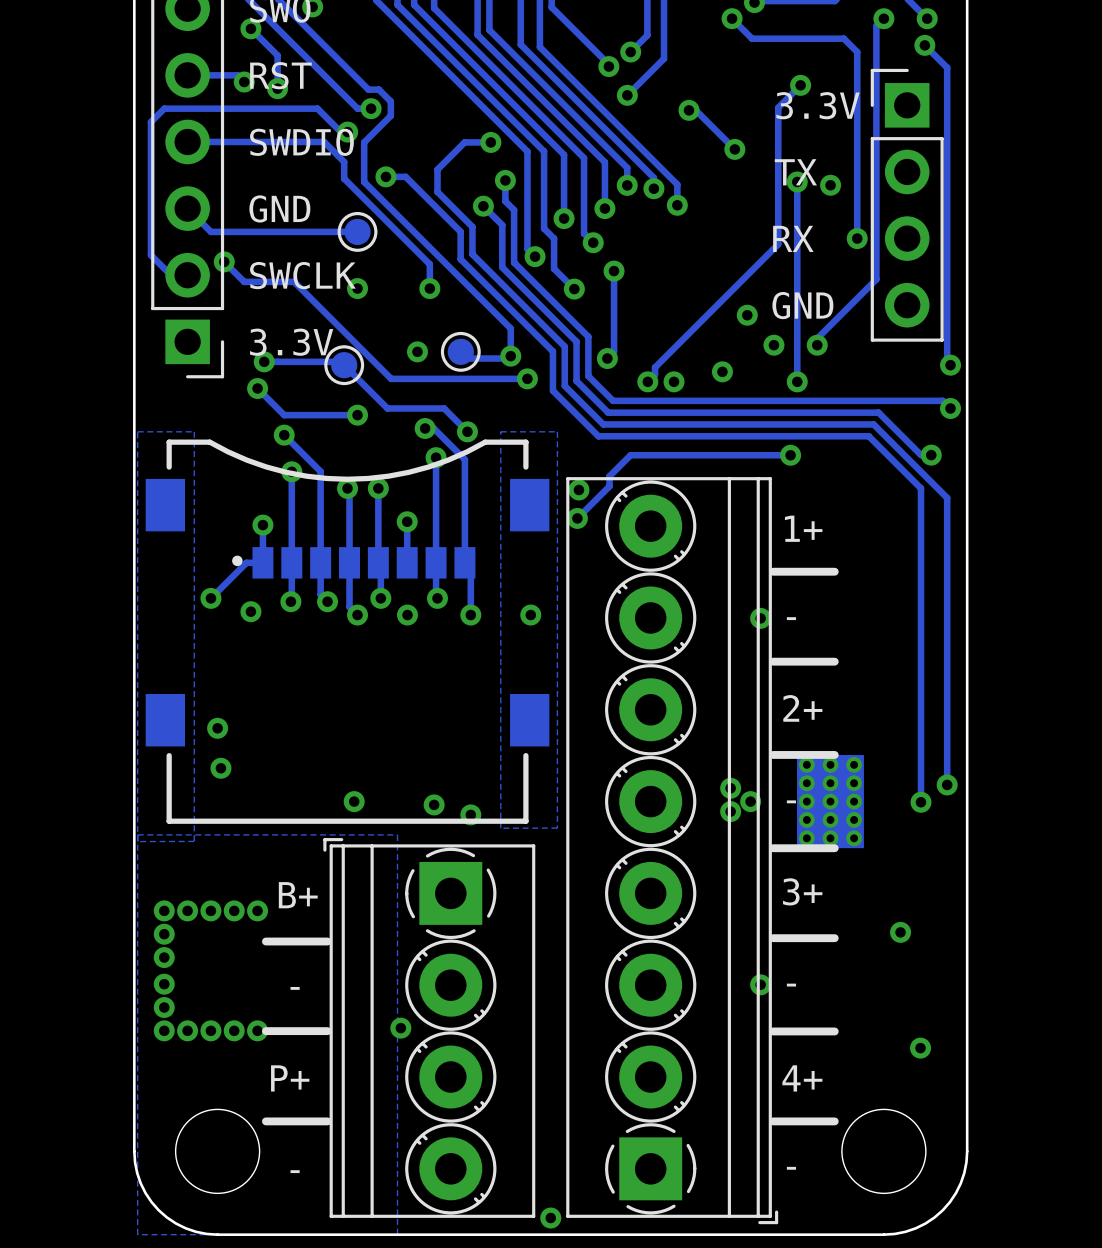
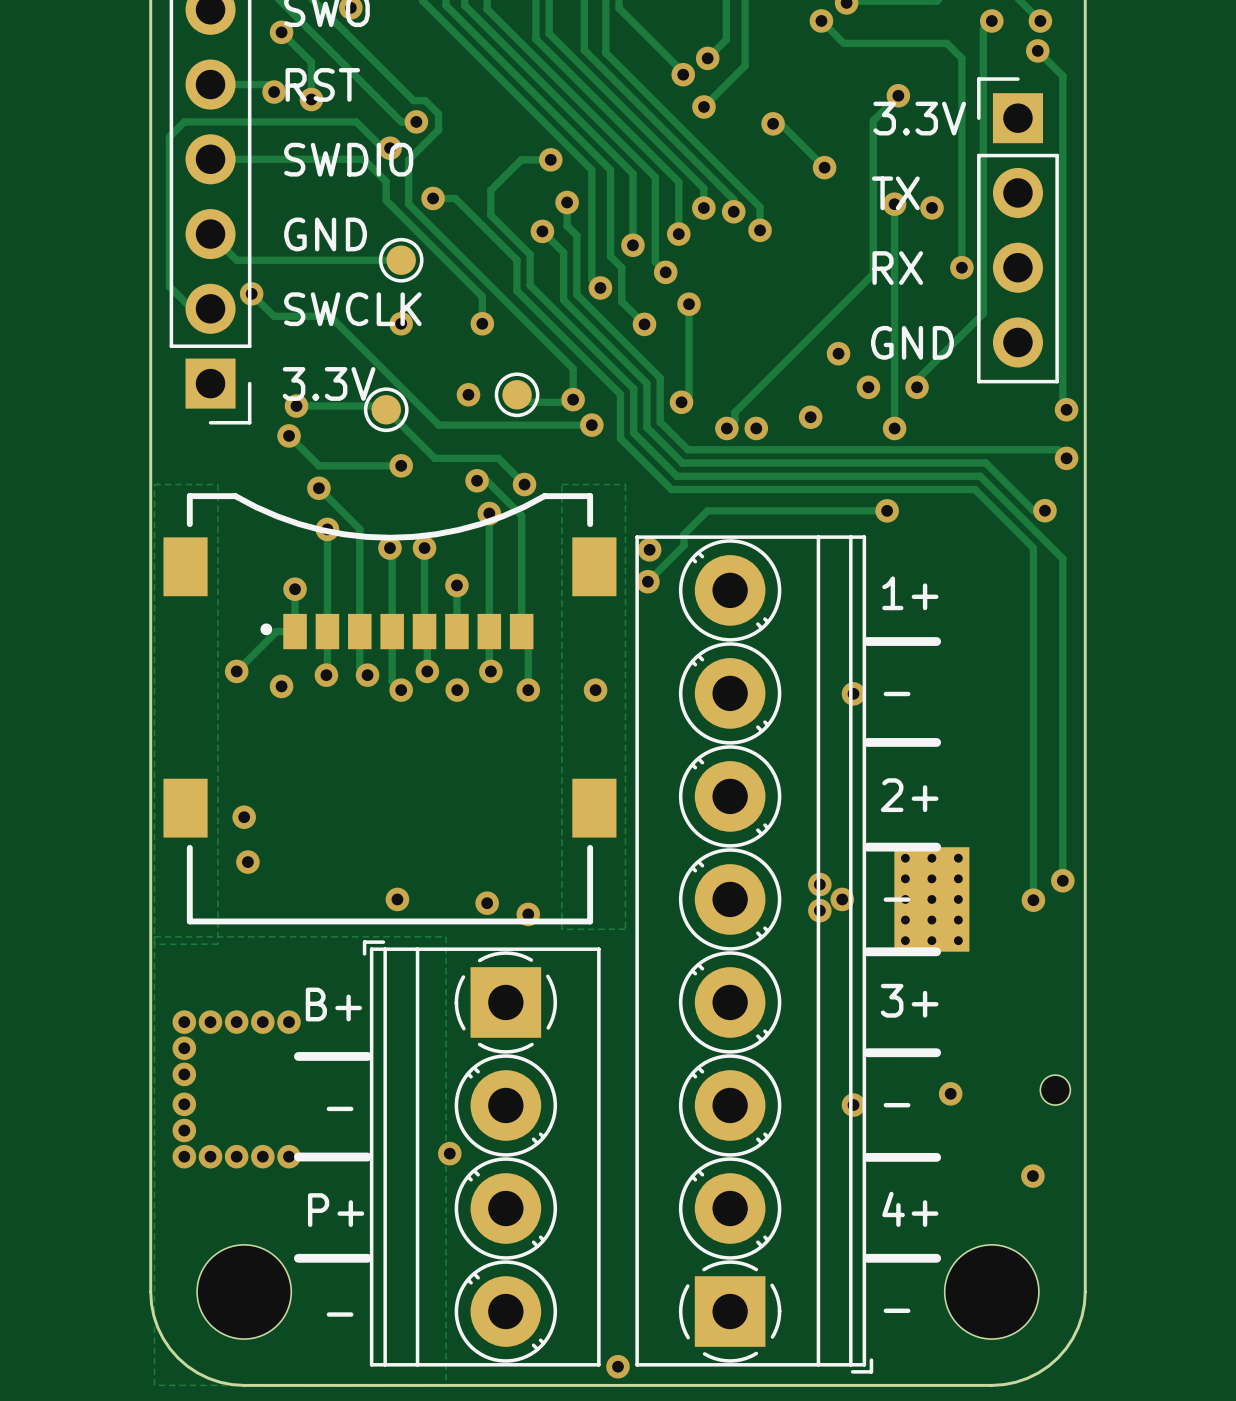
via position: (900, 932) -> (950, 1093)
part: none -> (1055, 1090)

